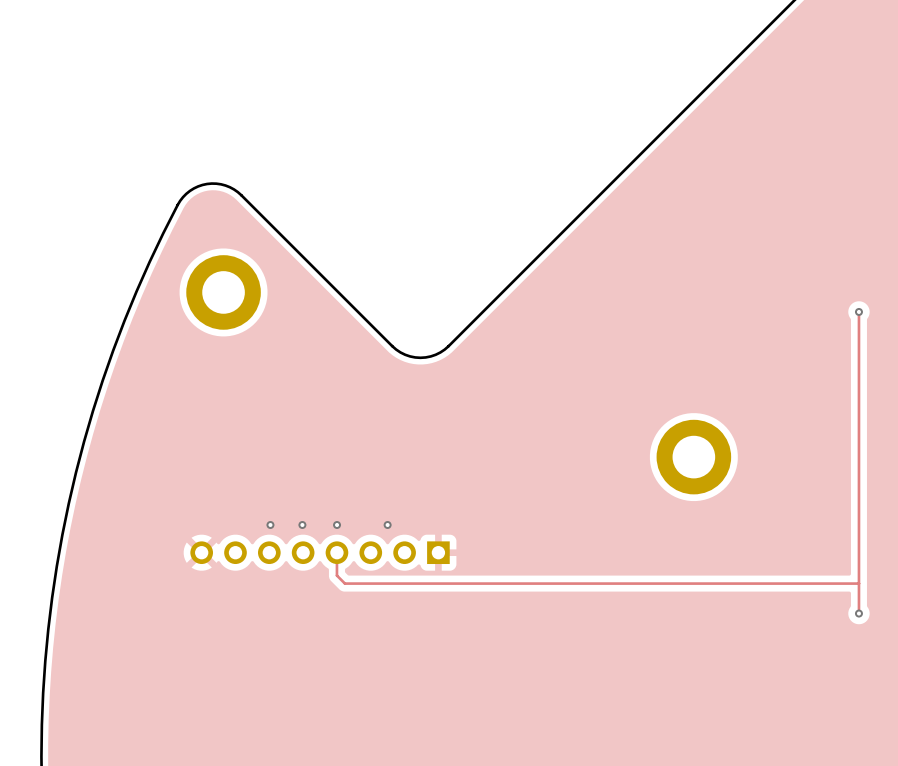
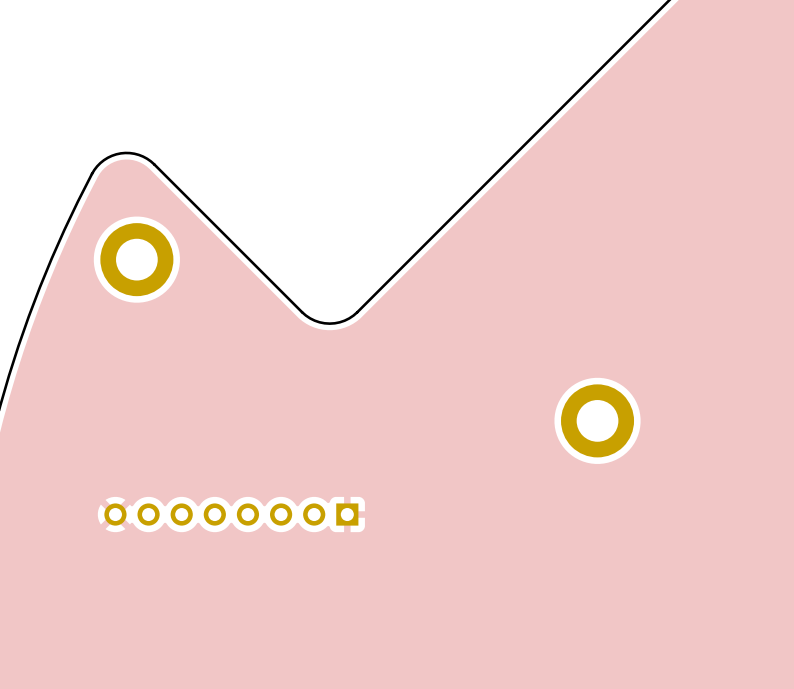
track: (858, 311) (858, 613) -> none
via: (858, 311) -> none
via: (270, 525) -> none
via: (302, 525) -> none
via: (337, 525) -> none
via: (387, 525) -> none
track: (336, 552) (336, 575) (344, 583) (858, 583) -> none
via: (858, 613) -> none

